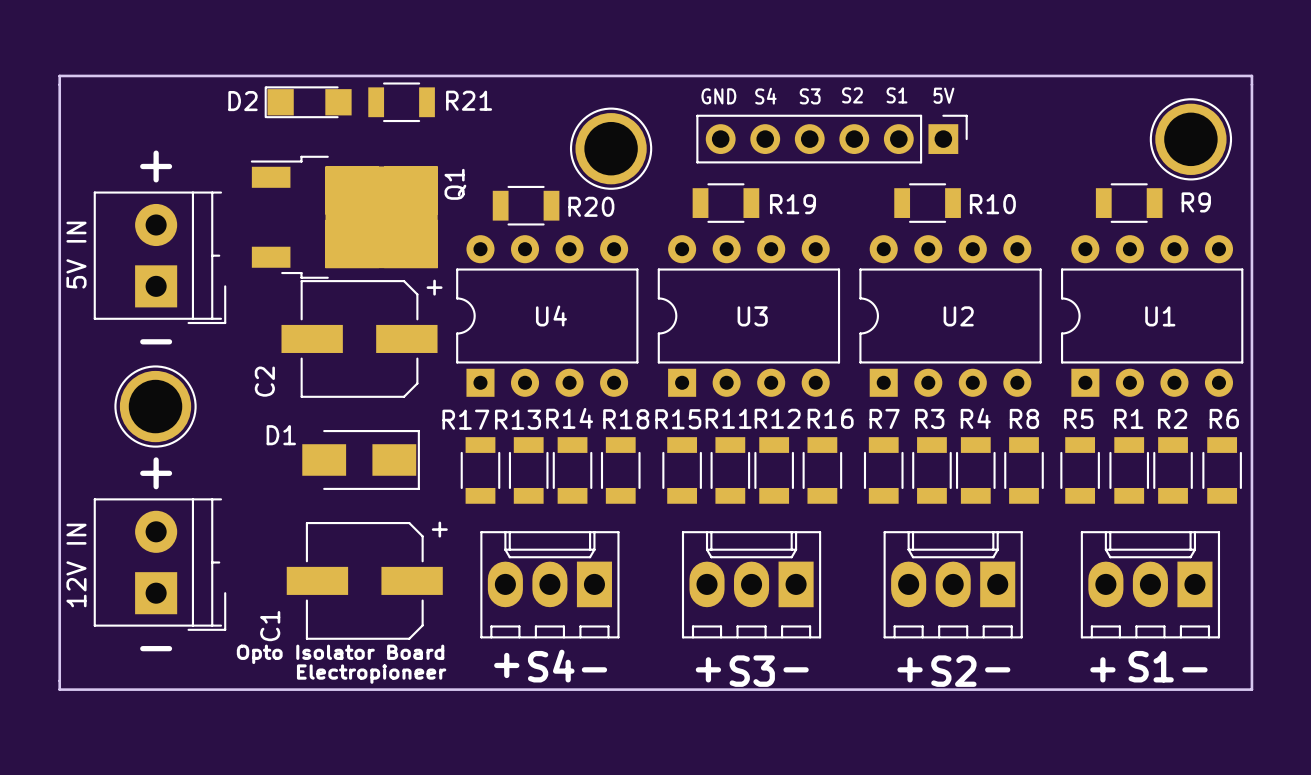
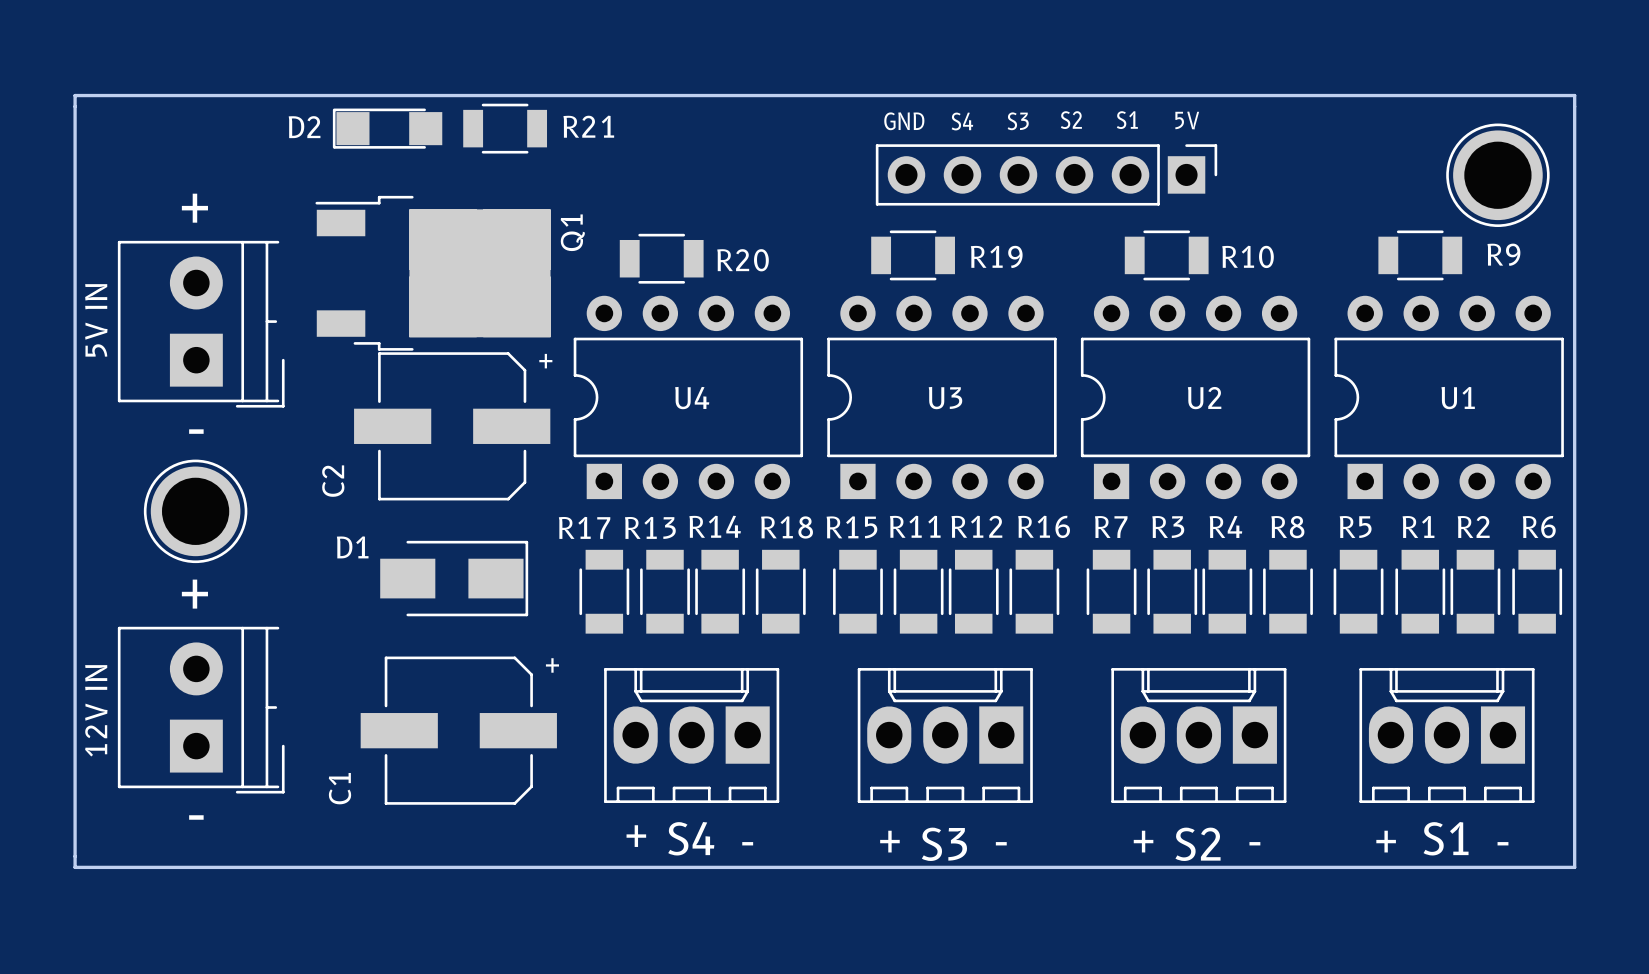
part: (611, 148) -> none
text: Opto Isolator Board (340, 654) -> none
text: Electropioneer (371, 674) -> none

